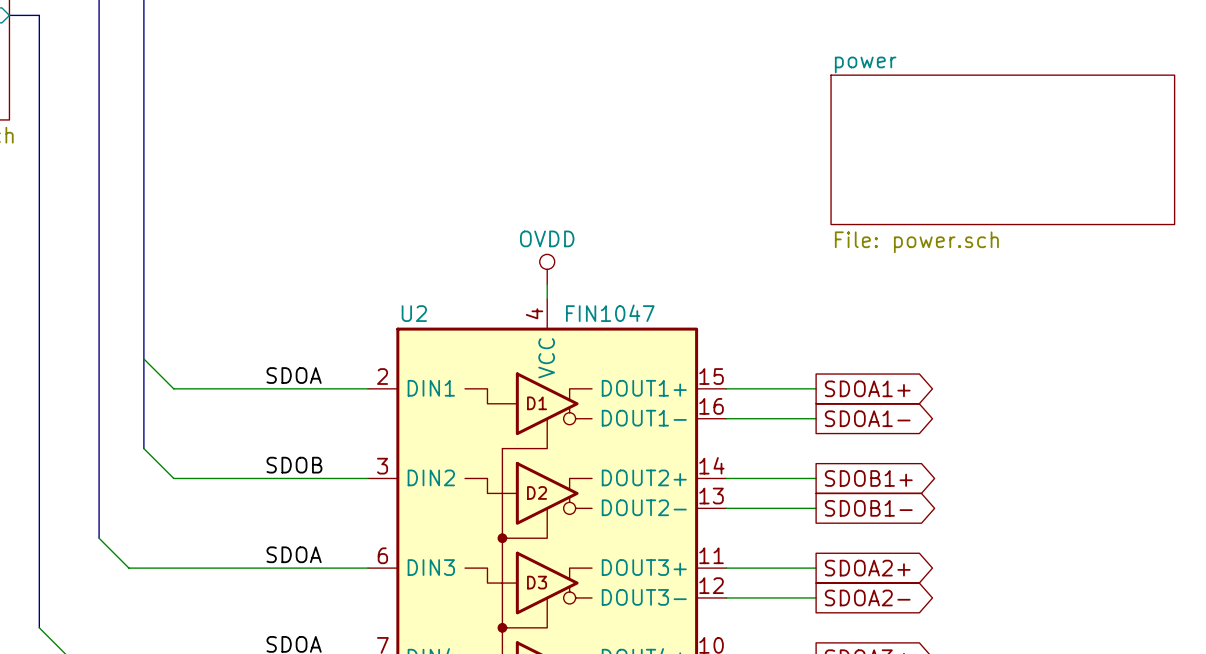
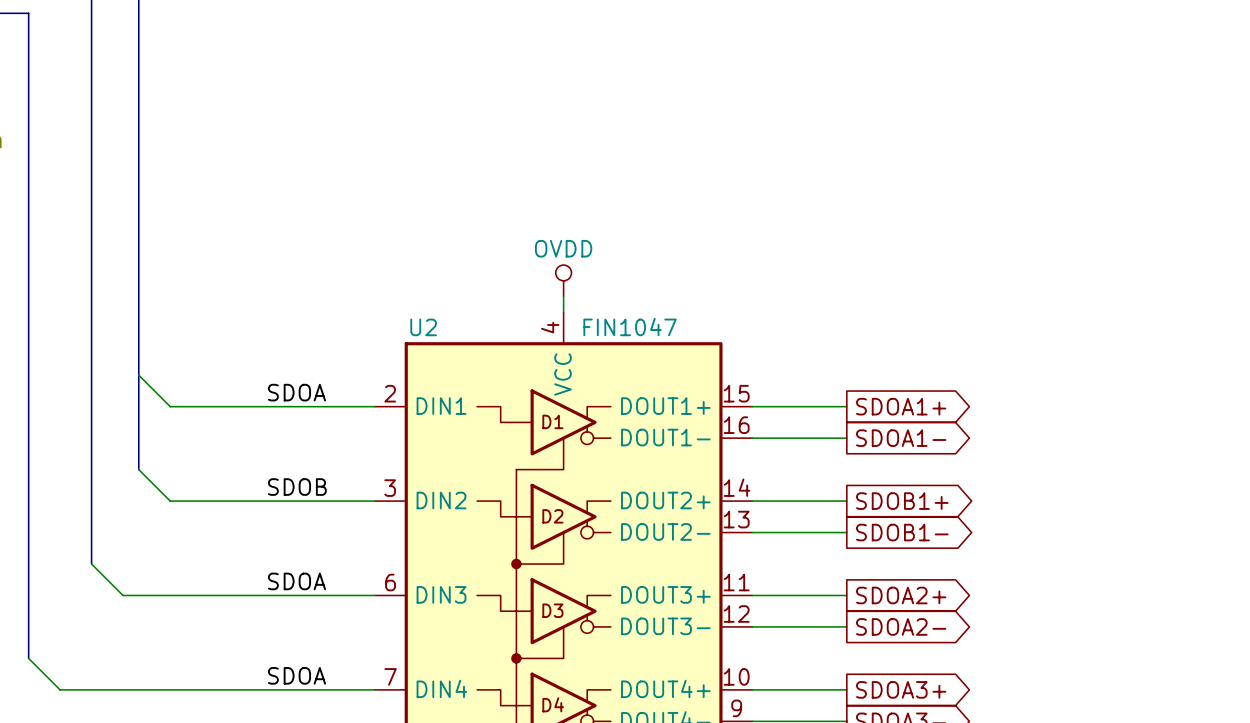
sheet power: File: power.sch (1002, 149) -> none

